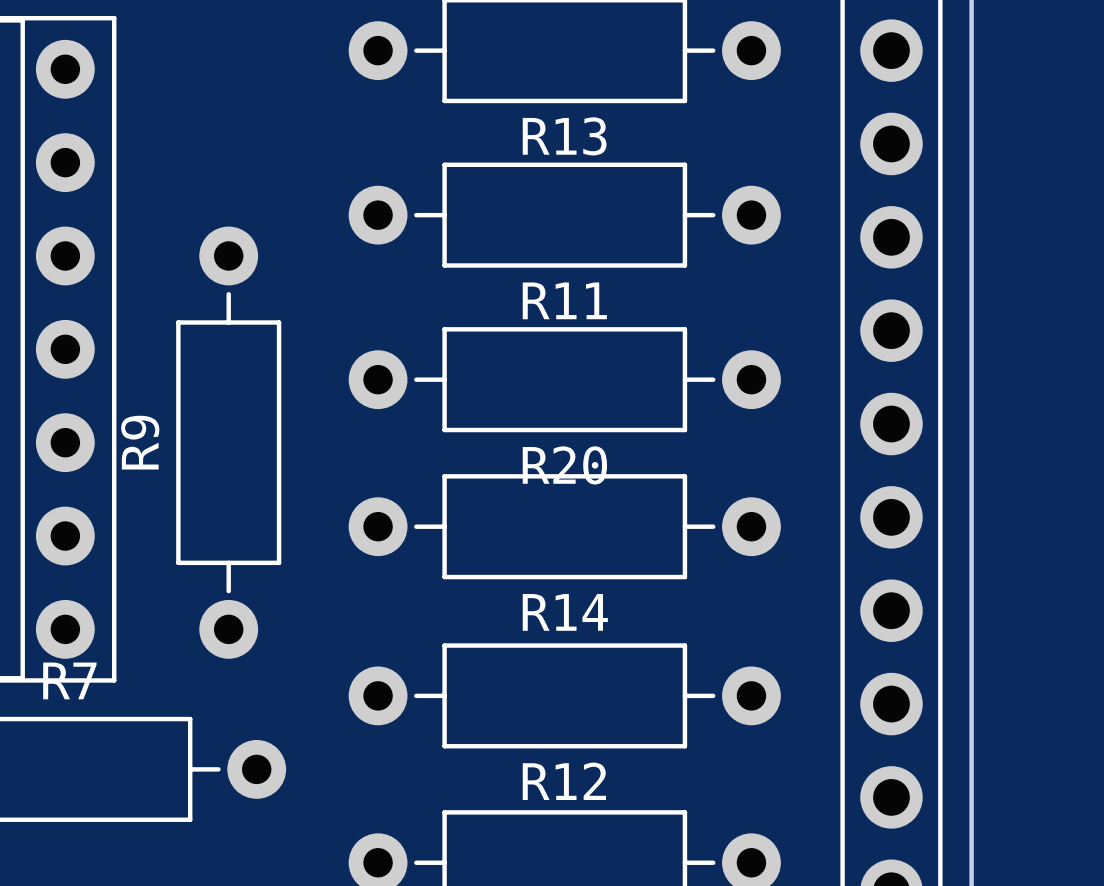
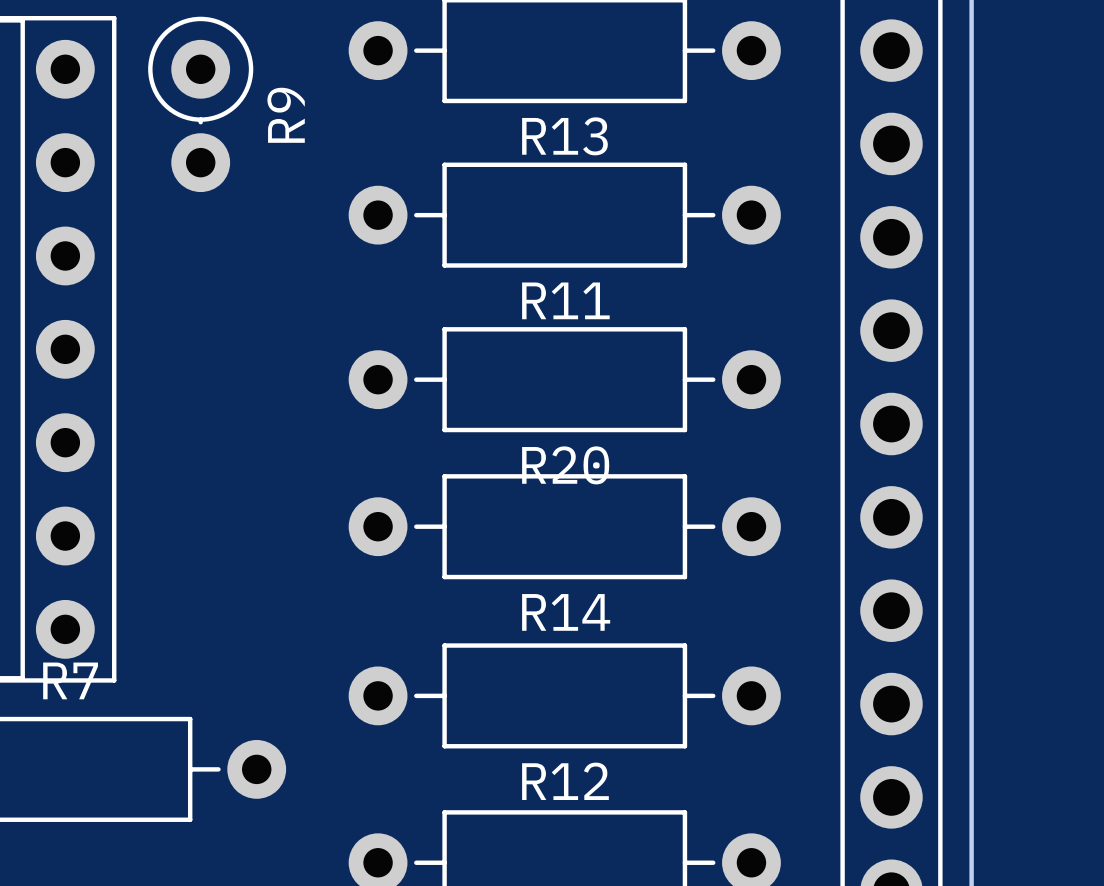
R9 footprint: [176, 226, 282, 659] -> [148, 16, 254, 193]
R9 name position: R9 (140, 442) -> R9 (286, 115)

